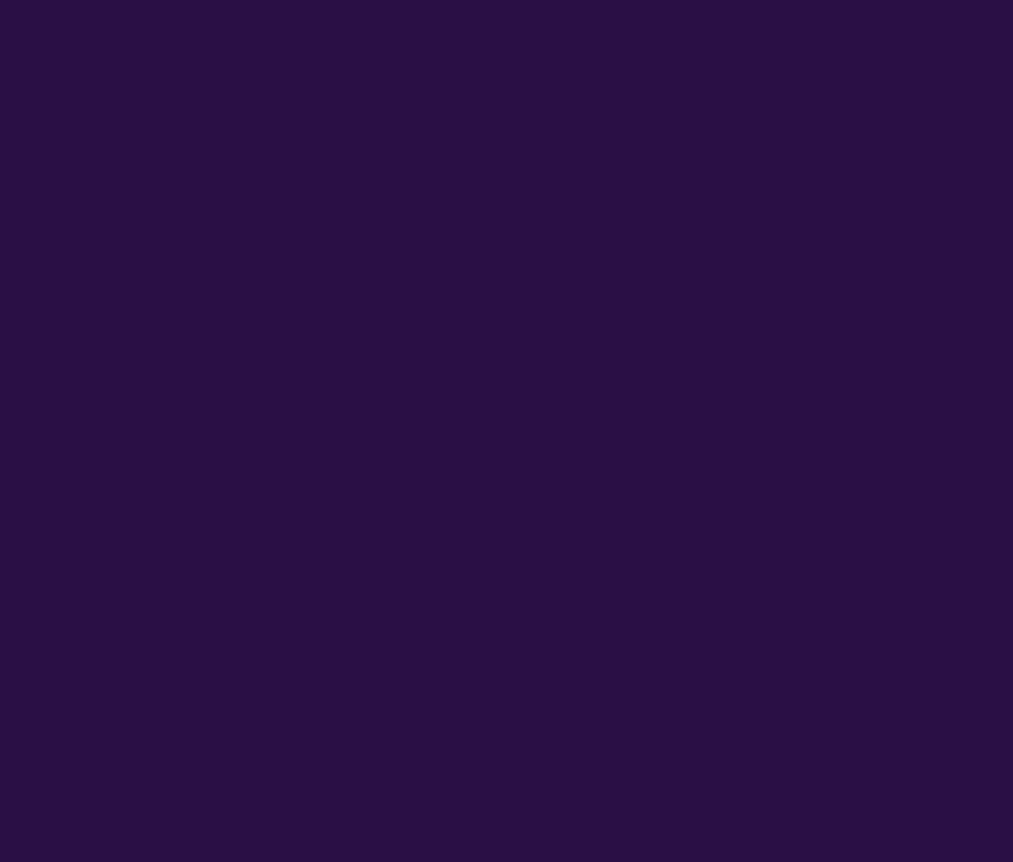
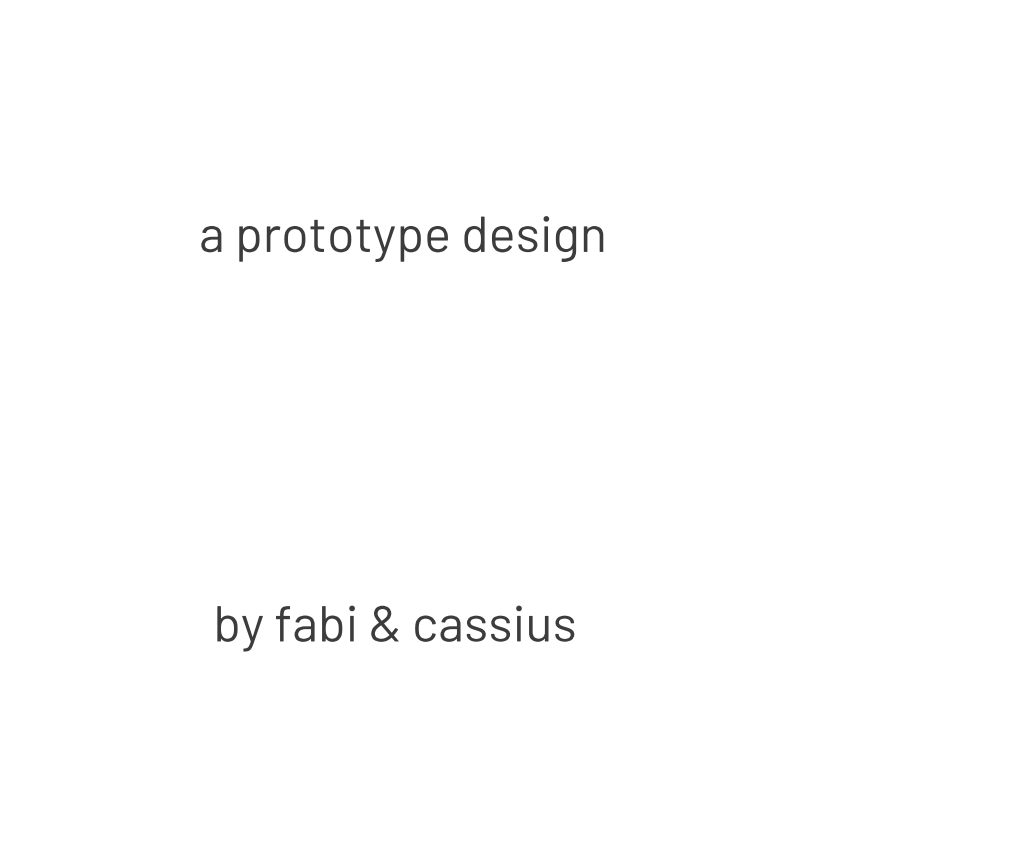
text: none -> a prototype design (402, 239)
text: none -> by fabi & cassius (395, 628)

